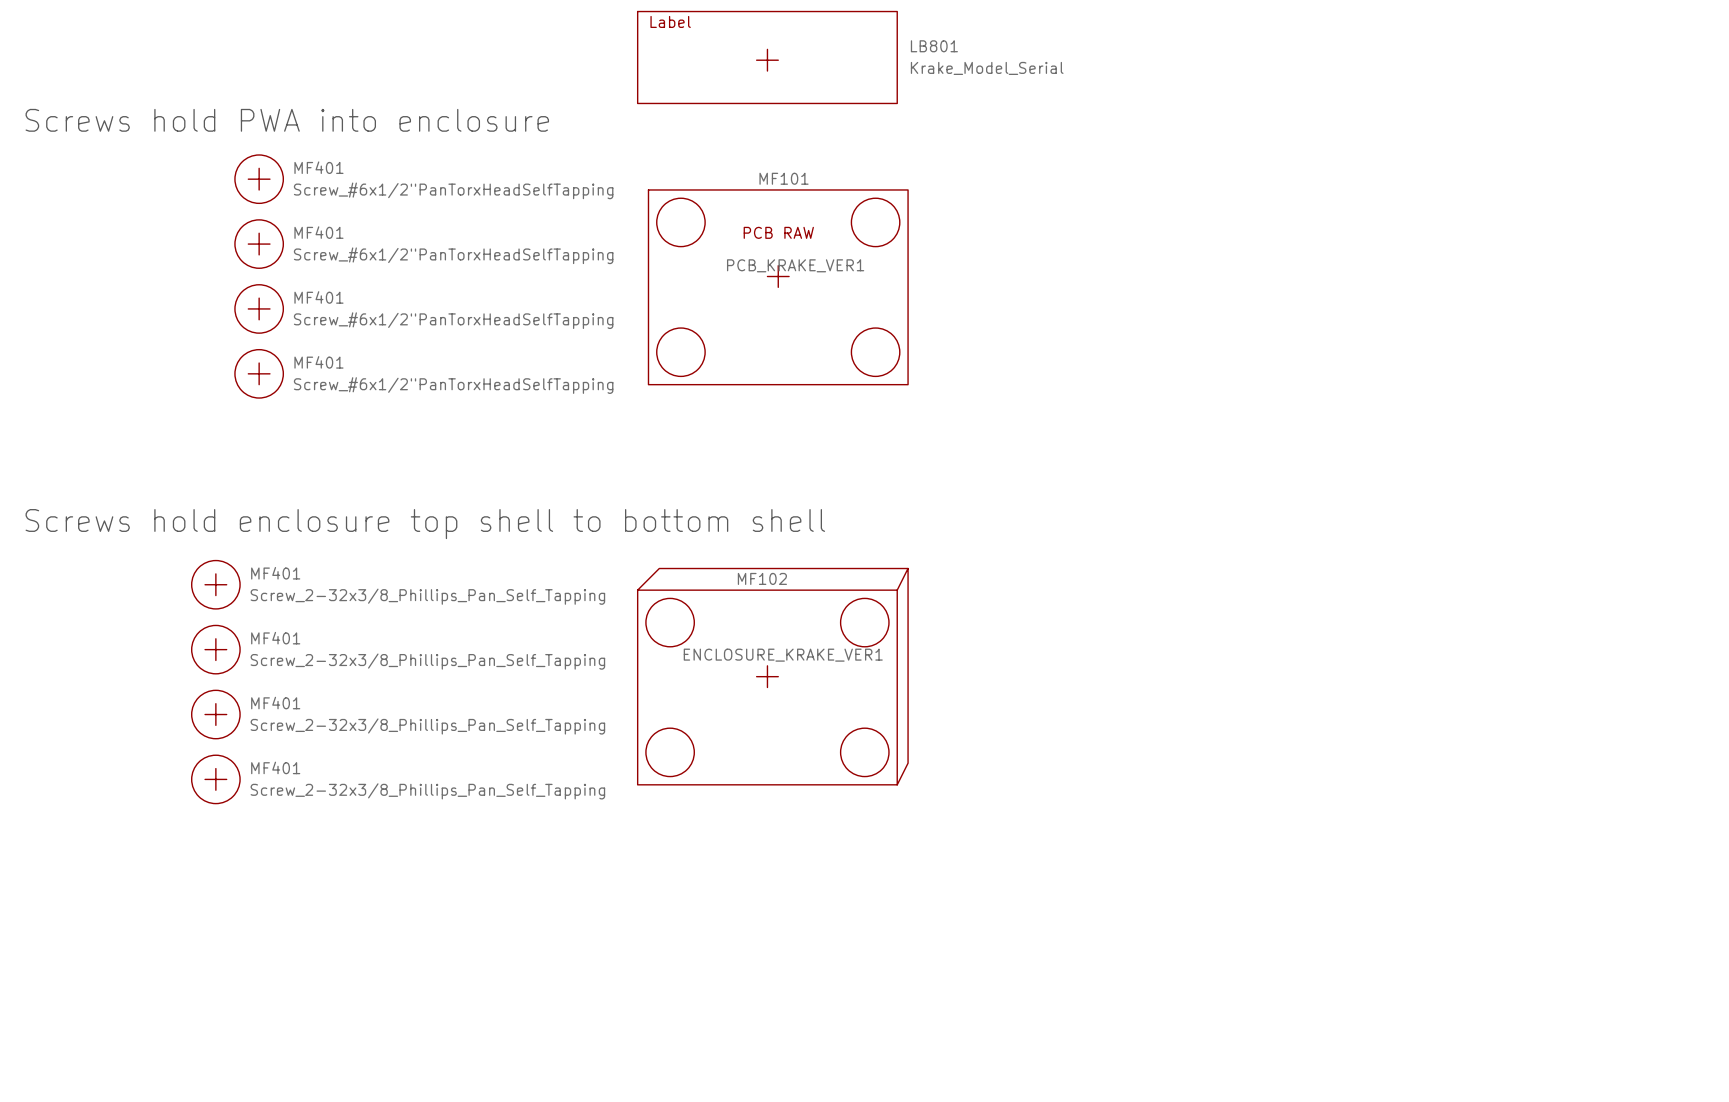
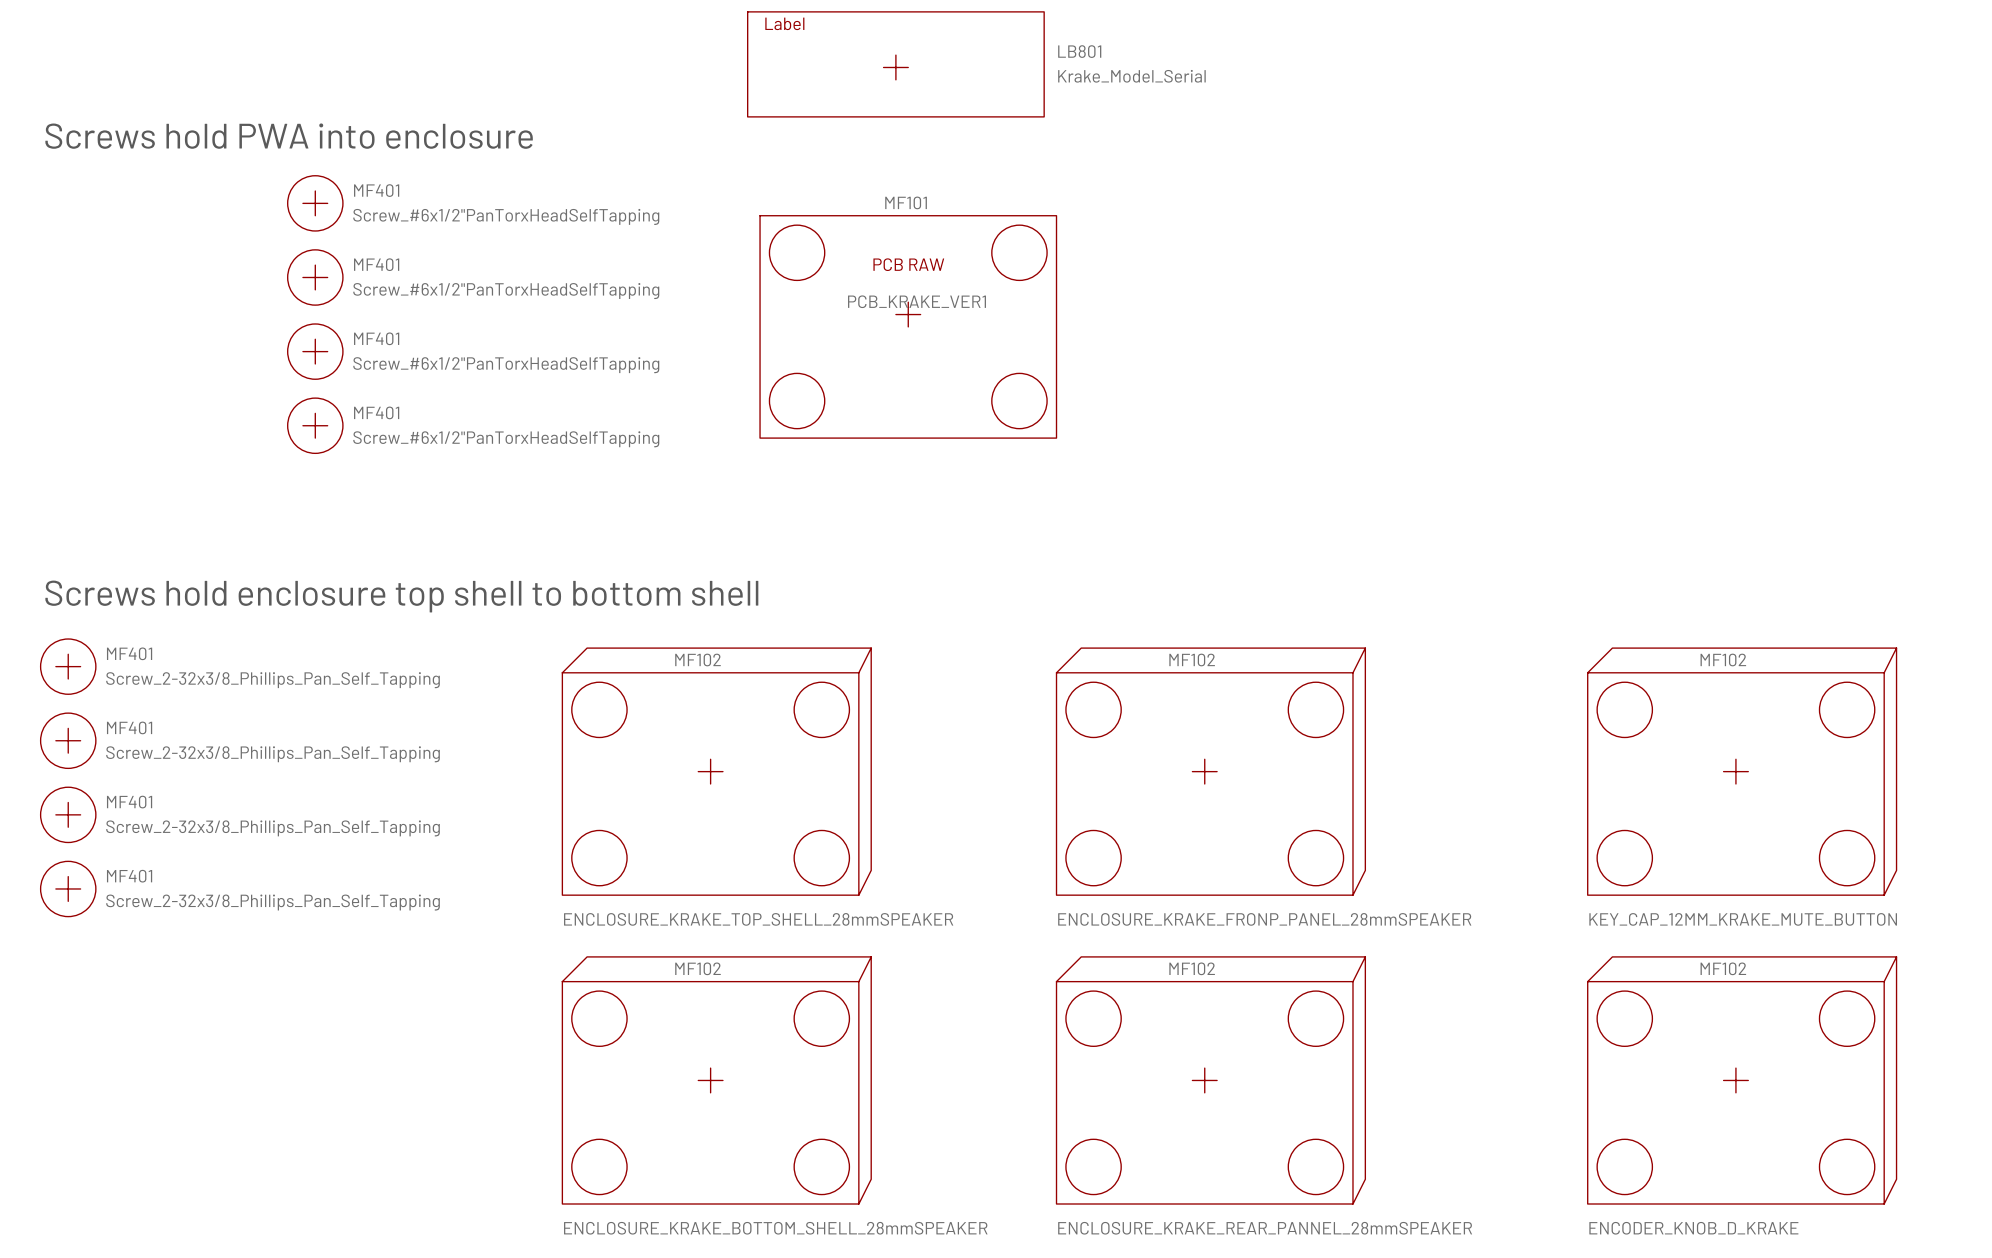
MF401: none -> Screw_2-32x3/8_Phillips_Pan_Self_Tapping (68, 666)
MF401: Screw_2-32x3/8_Phillips_Pan_Self_Tapping (215, 584) -> none
MF401: none -> Screw_2-32x3/8_Phillips_Pan_Self_Tapping (68, 740)
MF401: Screw_2-32x3/8_Phillips_Pan_Self_Tapping (215, 649) -> none
MF102: none -> ENCLOSURE_KRAKE_TOP_SHELL_28mmSPEAKER (716, 771)
MF102: ENCLOSURE_KRAKE_VER1 (772, 676) -> none
MF102: none -> ENCLOSURE_KRAKE_FRONP_PANEL_28mmSPEAKER (1210, 771)
MF102: none -> KEY_CAP_12MM_KRAKE_MUTE_BUTTON (1742, 771)
MF401: none -> Screw_2-32x3/8_Phillips_Pan_Self_Tapping (68, 814)
MF401: Screw_2-32x3/8_Phillips_Pan_Self_Tapping (215, 714) -> none
MF401: none -> Screw_2-32x3/8_Phillips_Pan_Self_Tapping (68, 888)
MF401: Screw_2-32x3/8_Phillips_Pan_Self_Tapping (215, 779) -> none
MF102: none -> ENCLOSURE_KRAKE_BOTTOM_SHELL_28mmSPEAKER (716, 1080)
MF102: none -> ENCLOSURE_KRAKE_REAR_PANNEL_28mmSPEAKER (1210, 1080)
MF102: none -> ENCODER_KNOB_D_KRAKE (1742, 1080)

